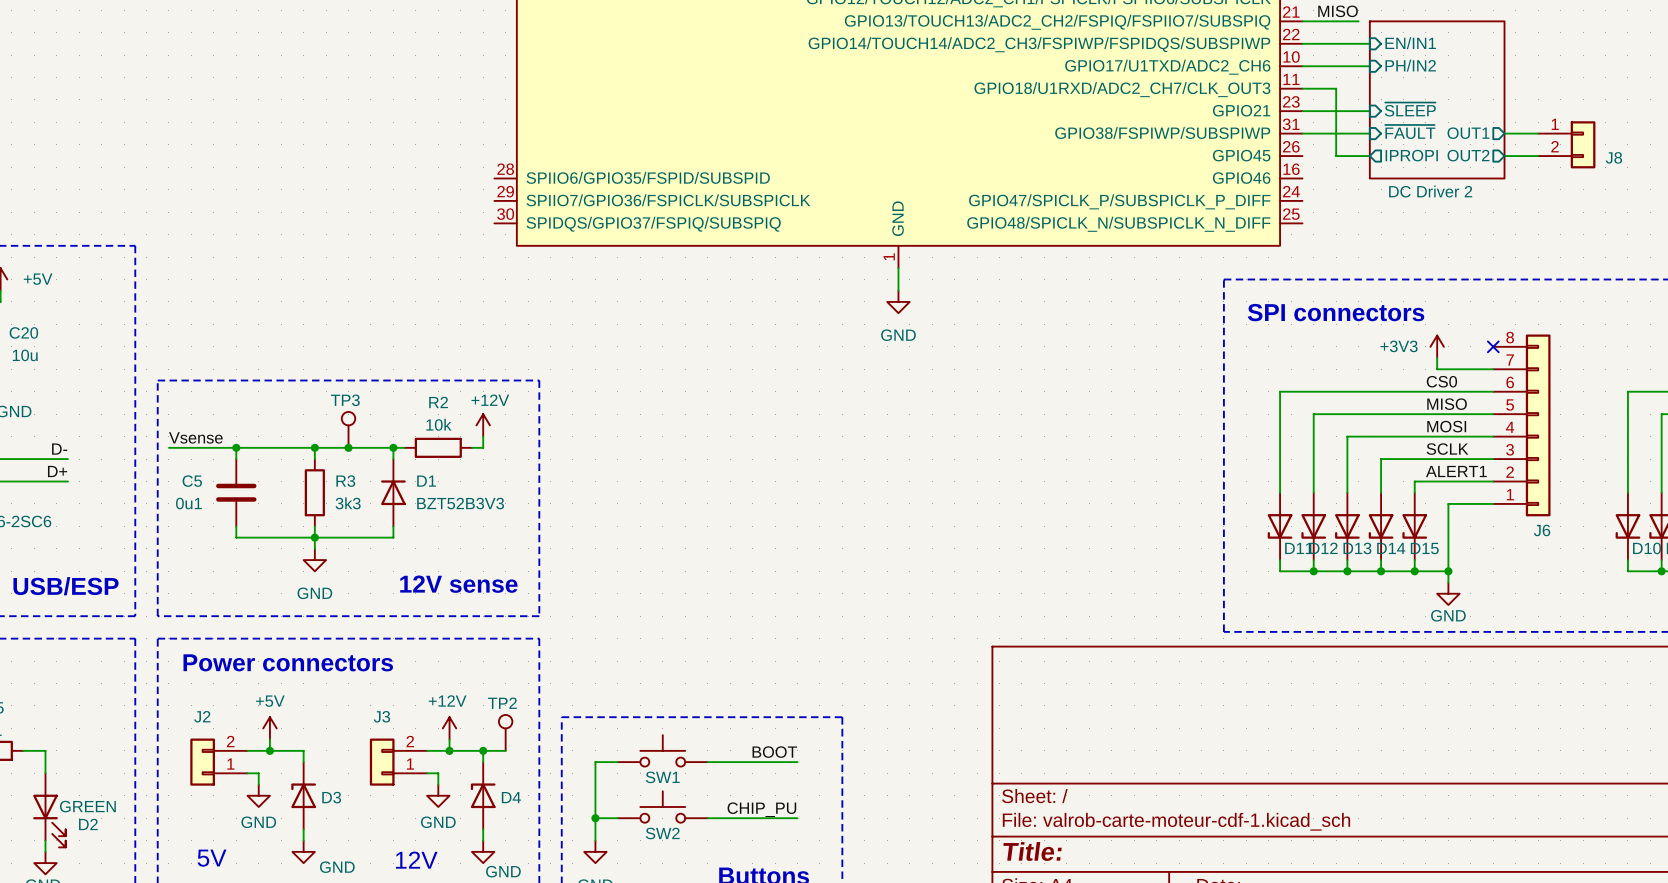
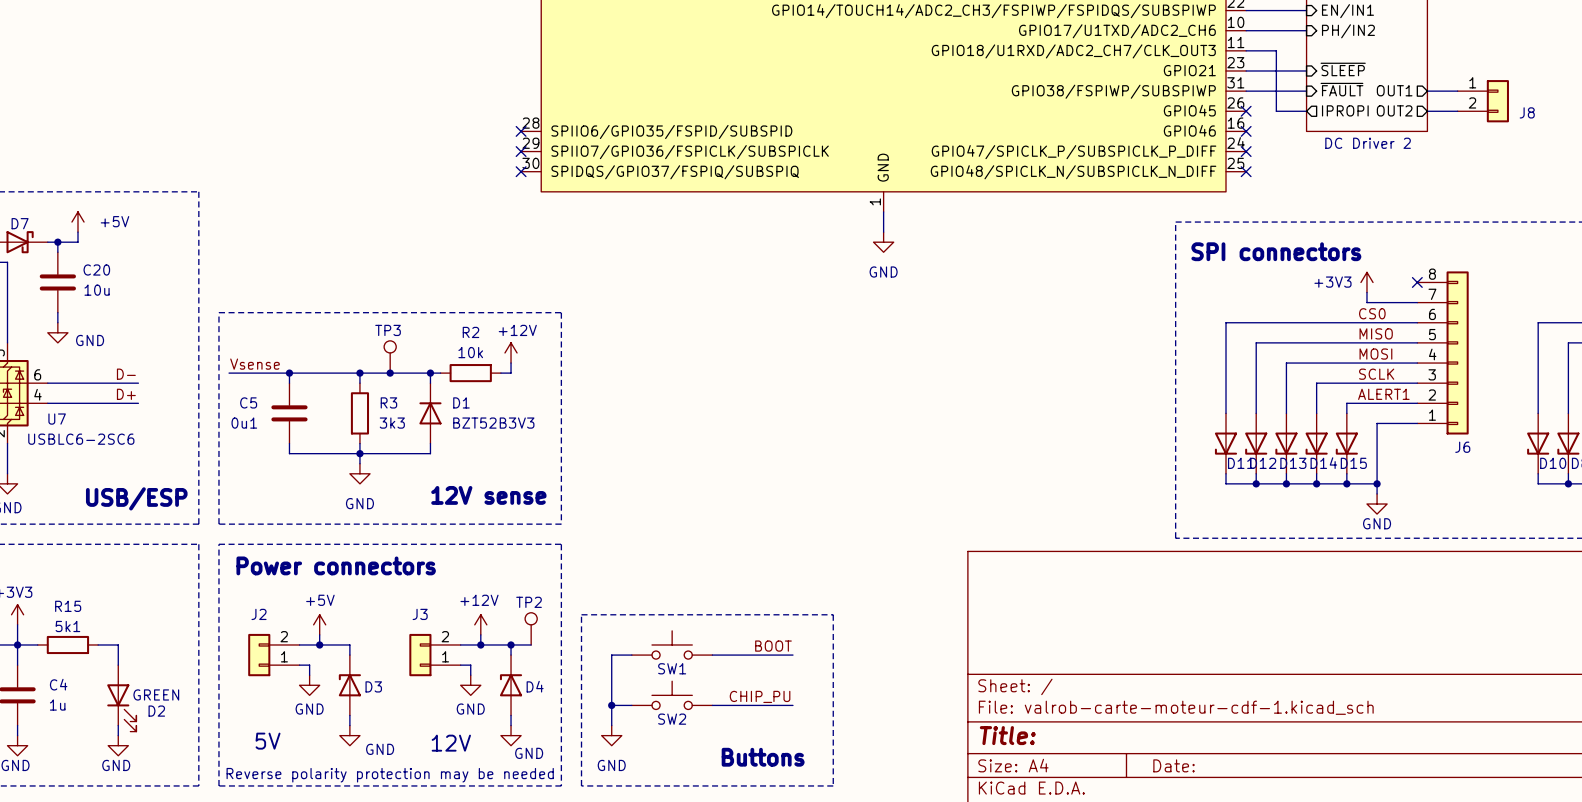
no-connect mark: none -> (1246, 111)
no-connect mark: none -> (521, 131)
no-connect mark: none -> (1246, 131)
no-connect mark: none -> (521, 151)
no-connect mark: none -> (1246, 151)
no-connect mark: none -> (521, 171)
no-connect mark: none -> (1246, 171)

